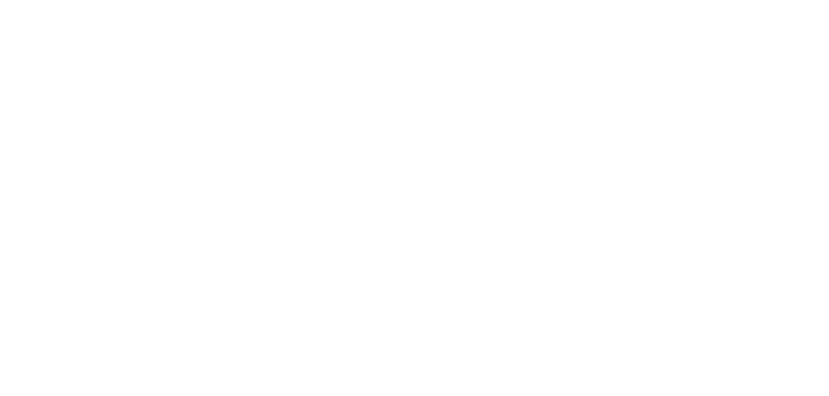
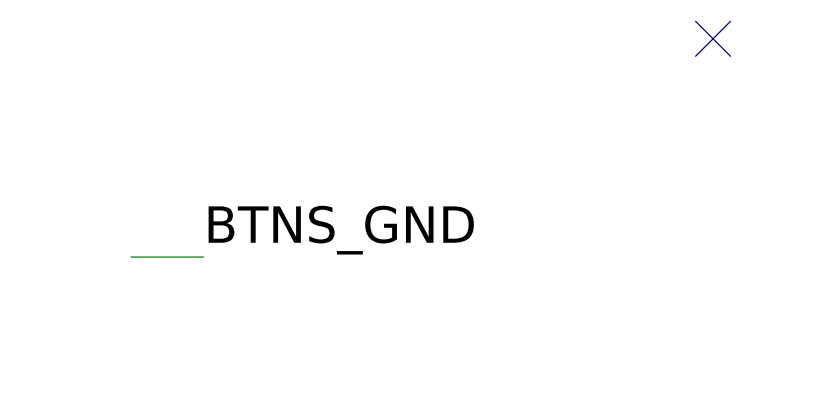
no-connect mark: none -> (713, 38)
label: none -> BTNS_GND (341, 230)
wire: none -> (130, 257) (203, 257)

